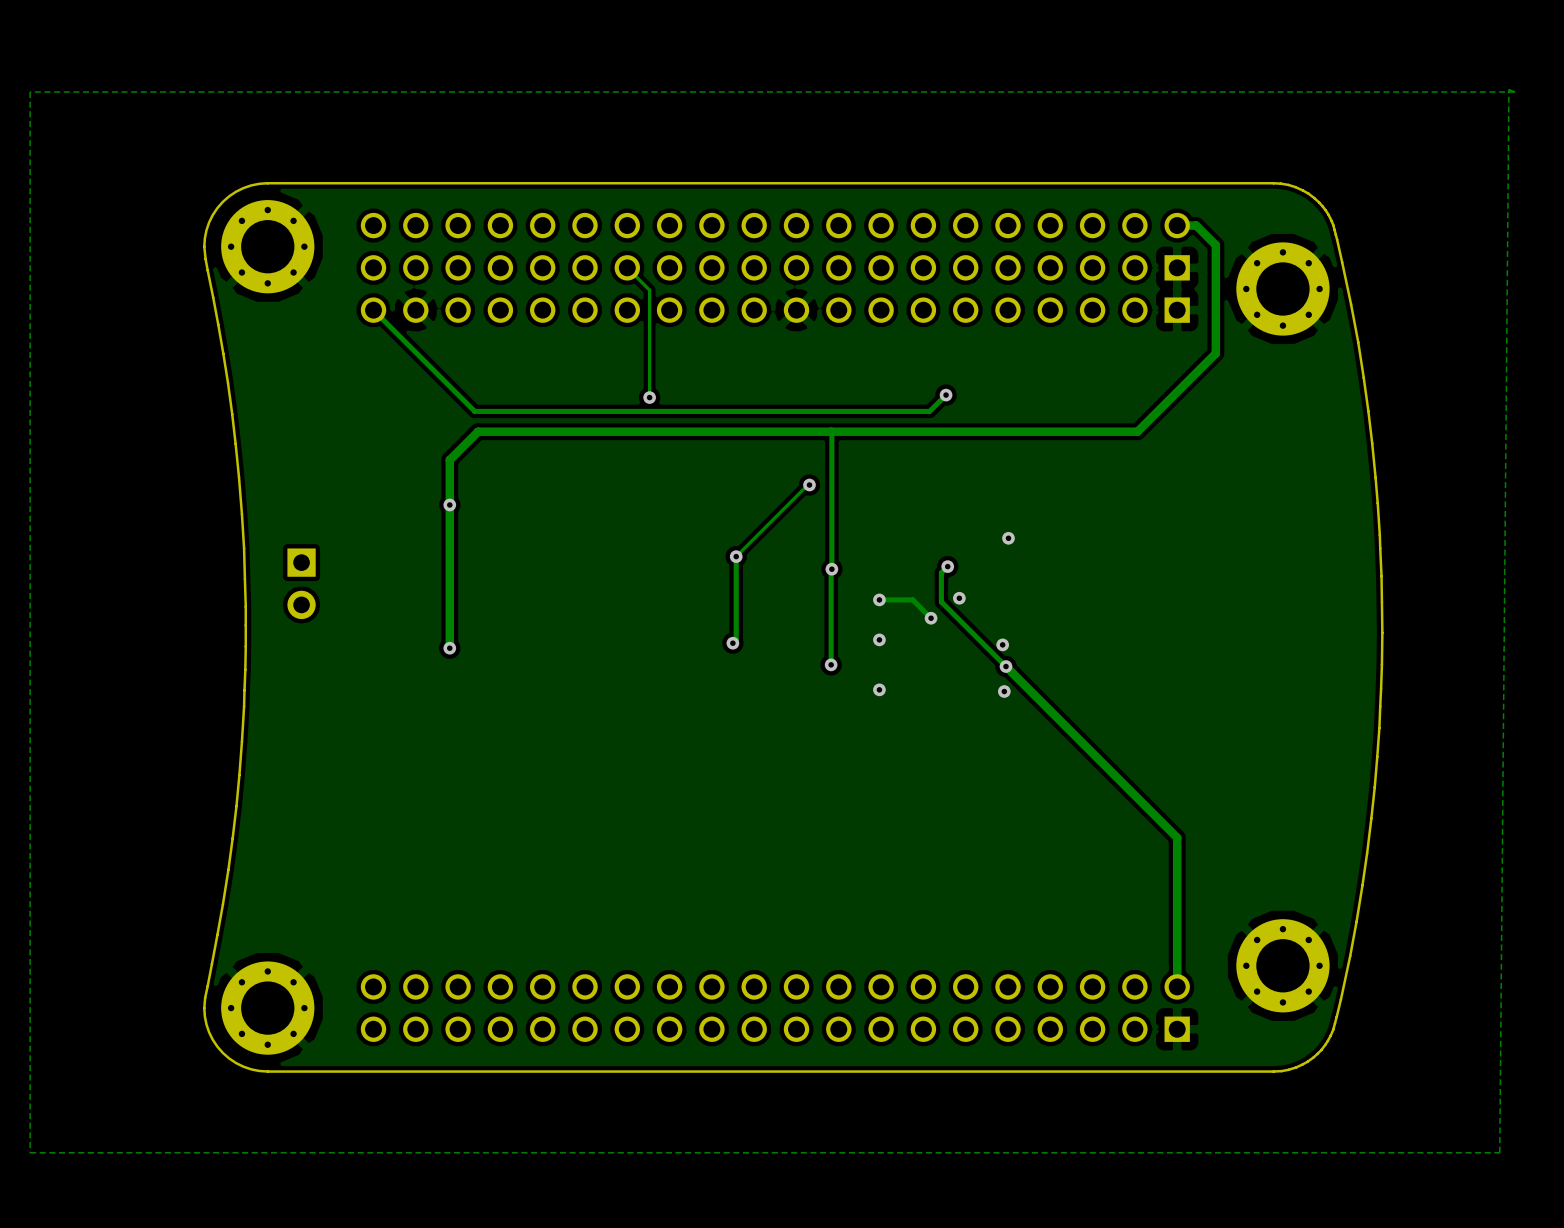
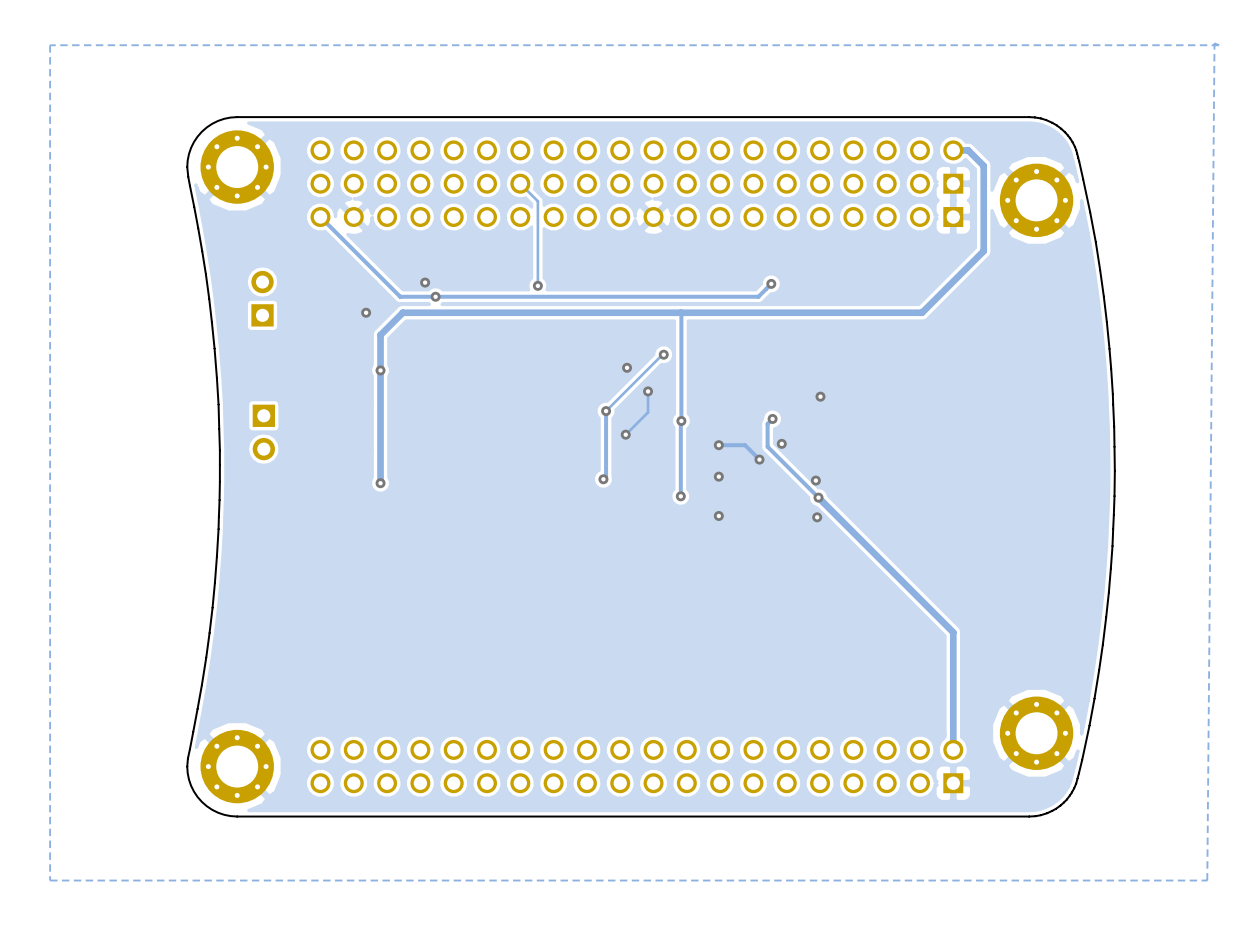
via: none -> (425, 282)
via: none -> (435, 296)
part: none -> (262, 298)
via: none -> (366, 312)
via: none -> (627, 367)
track: none -> (648, 391) (648, 412) (625, 434)
via: none -> (648, 391)
via: none -> (625, 434)

